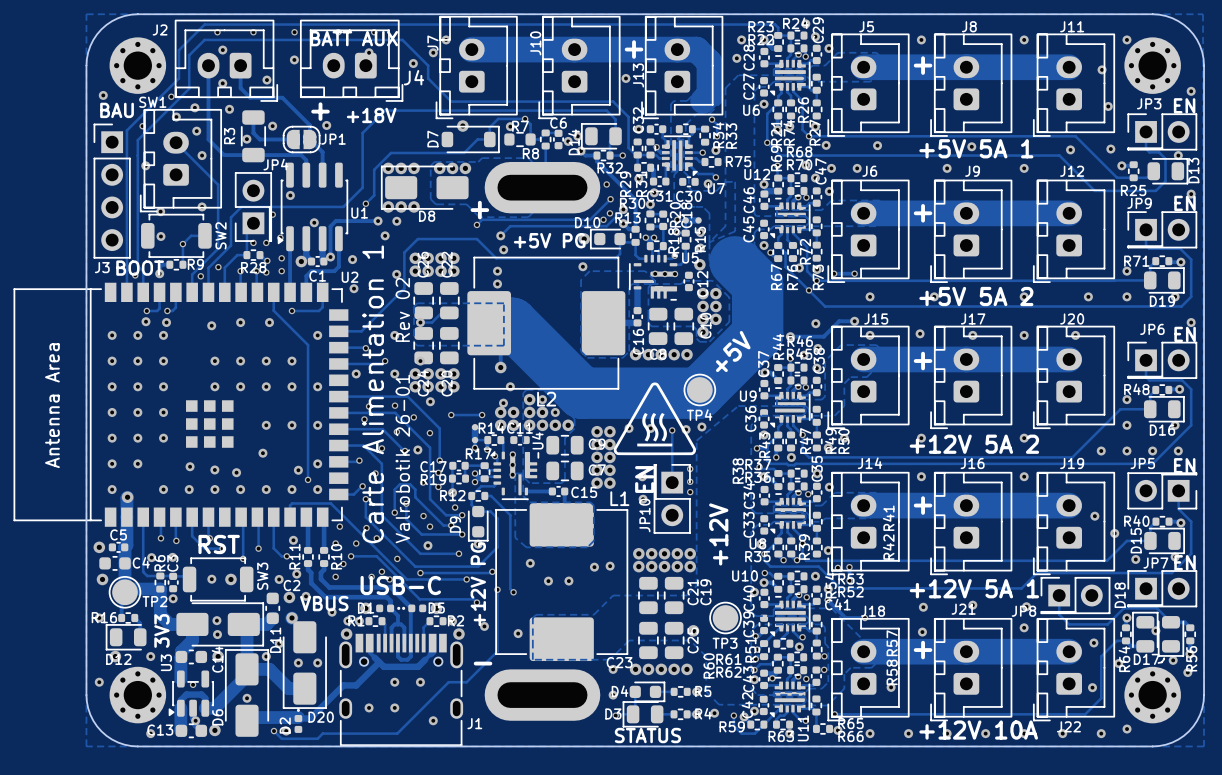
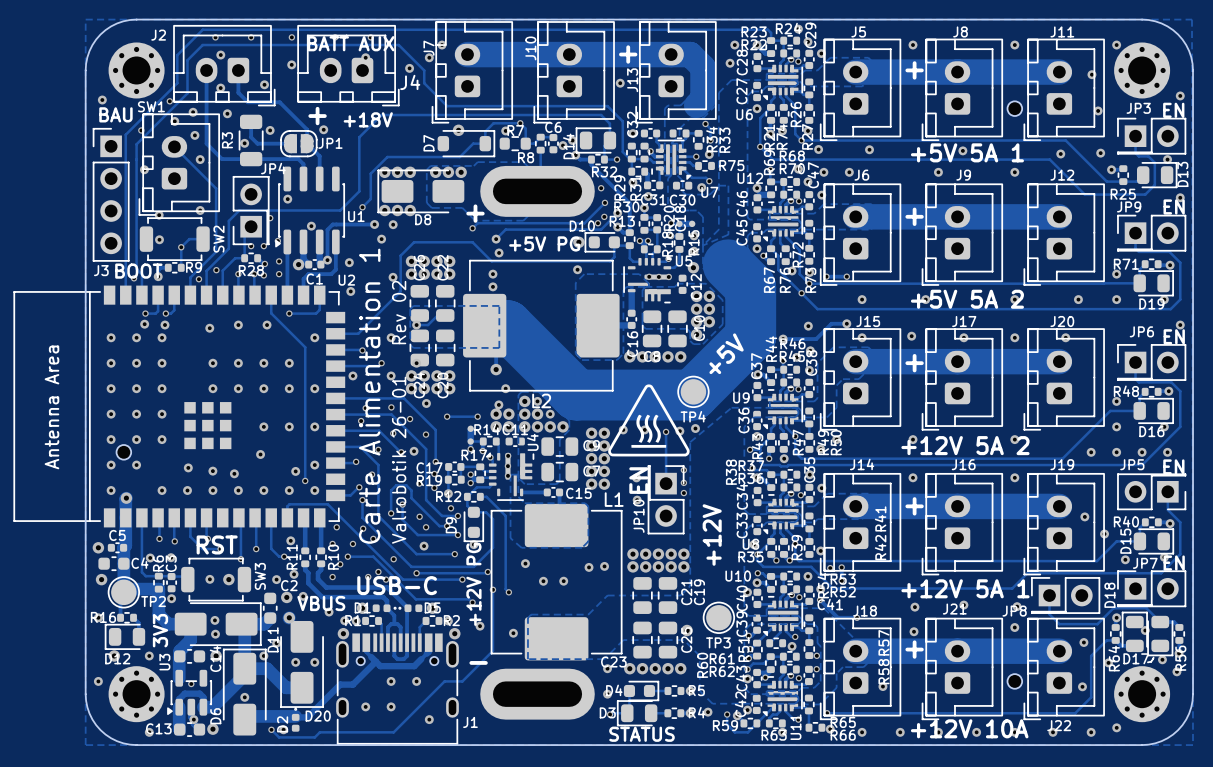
part: none -> (1014, 108)
part: none -> (123, 452)
part: none -> (1014, 681)

